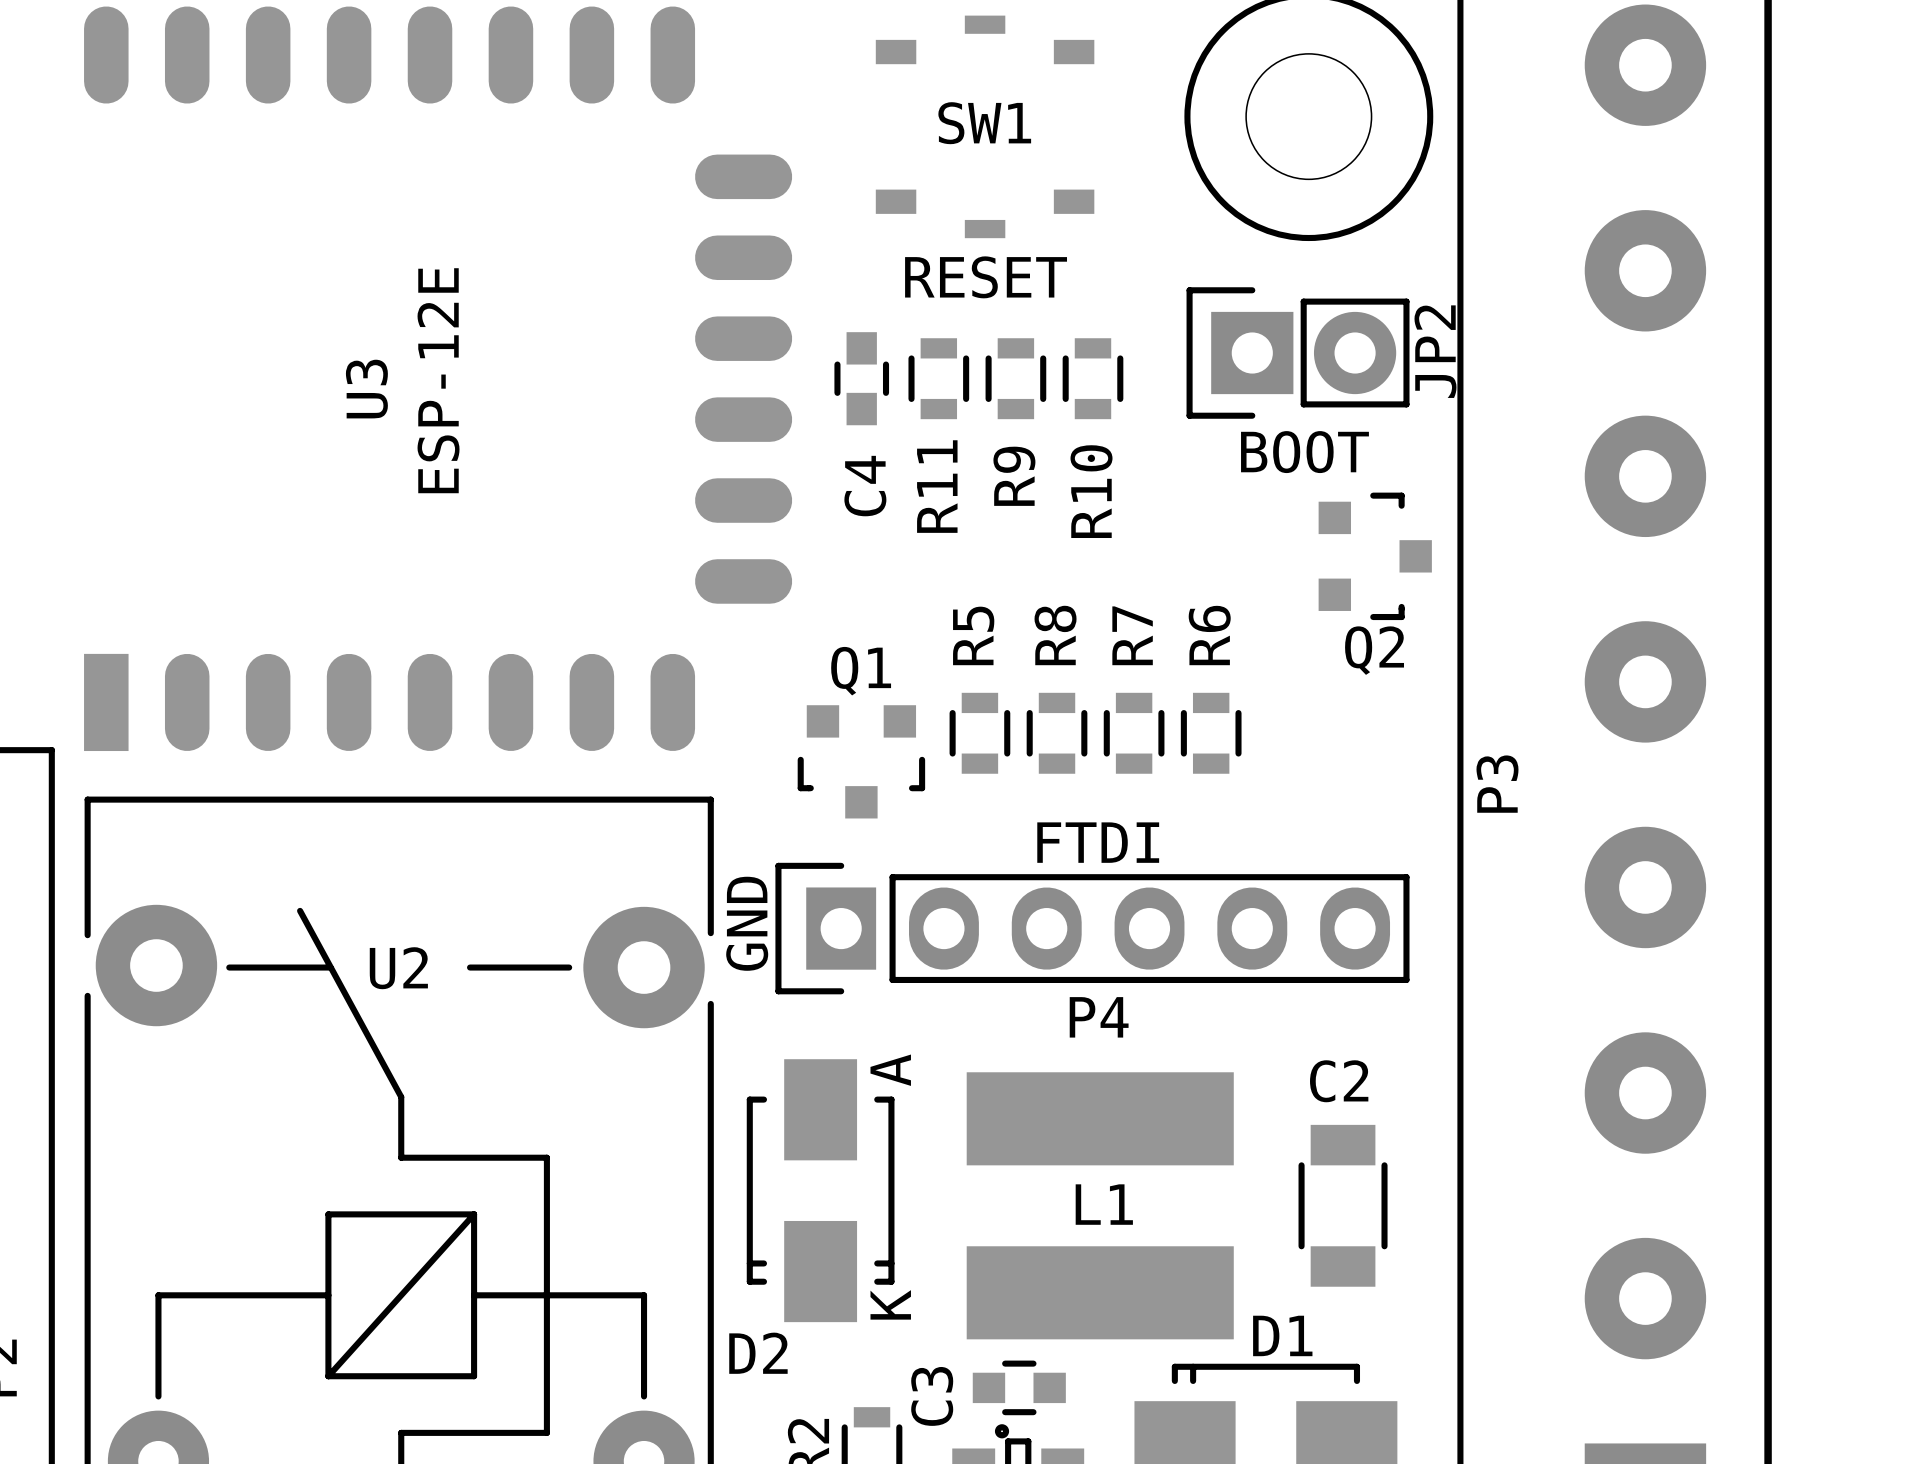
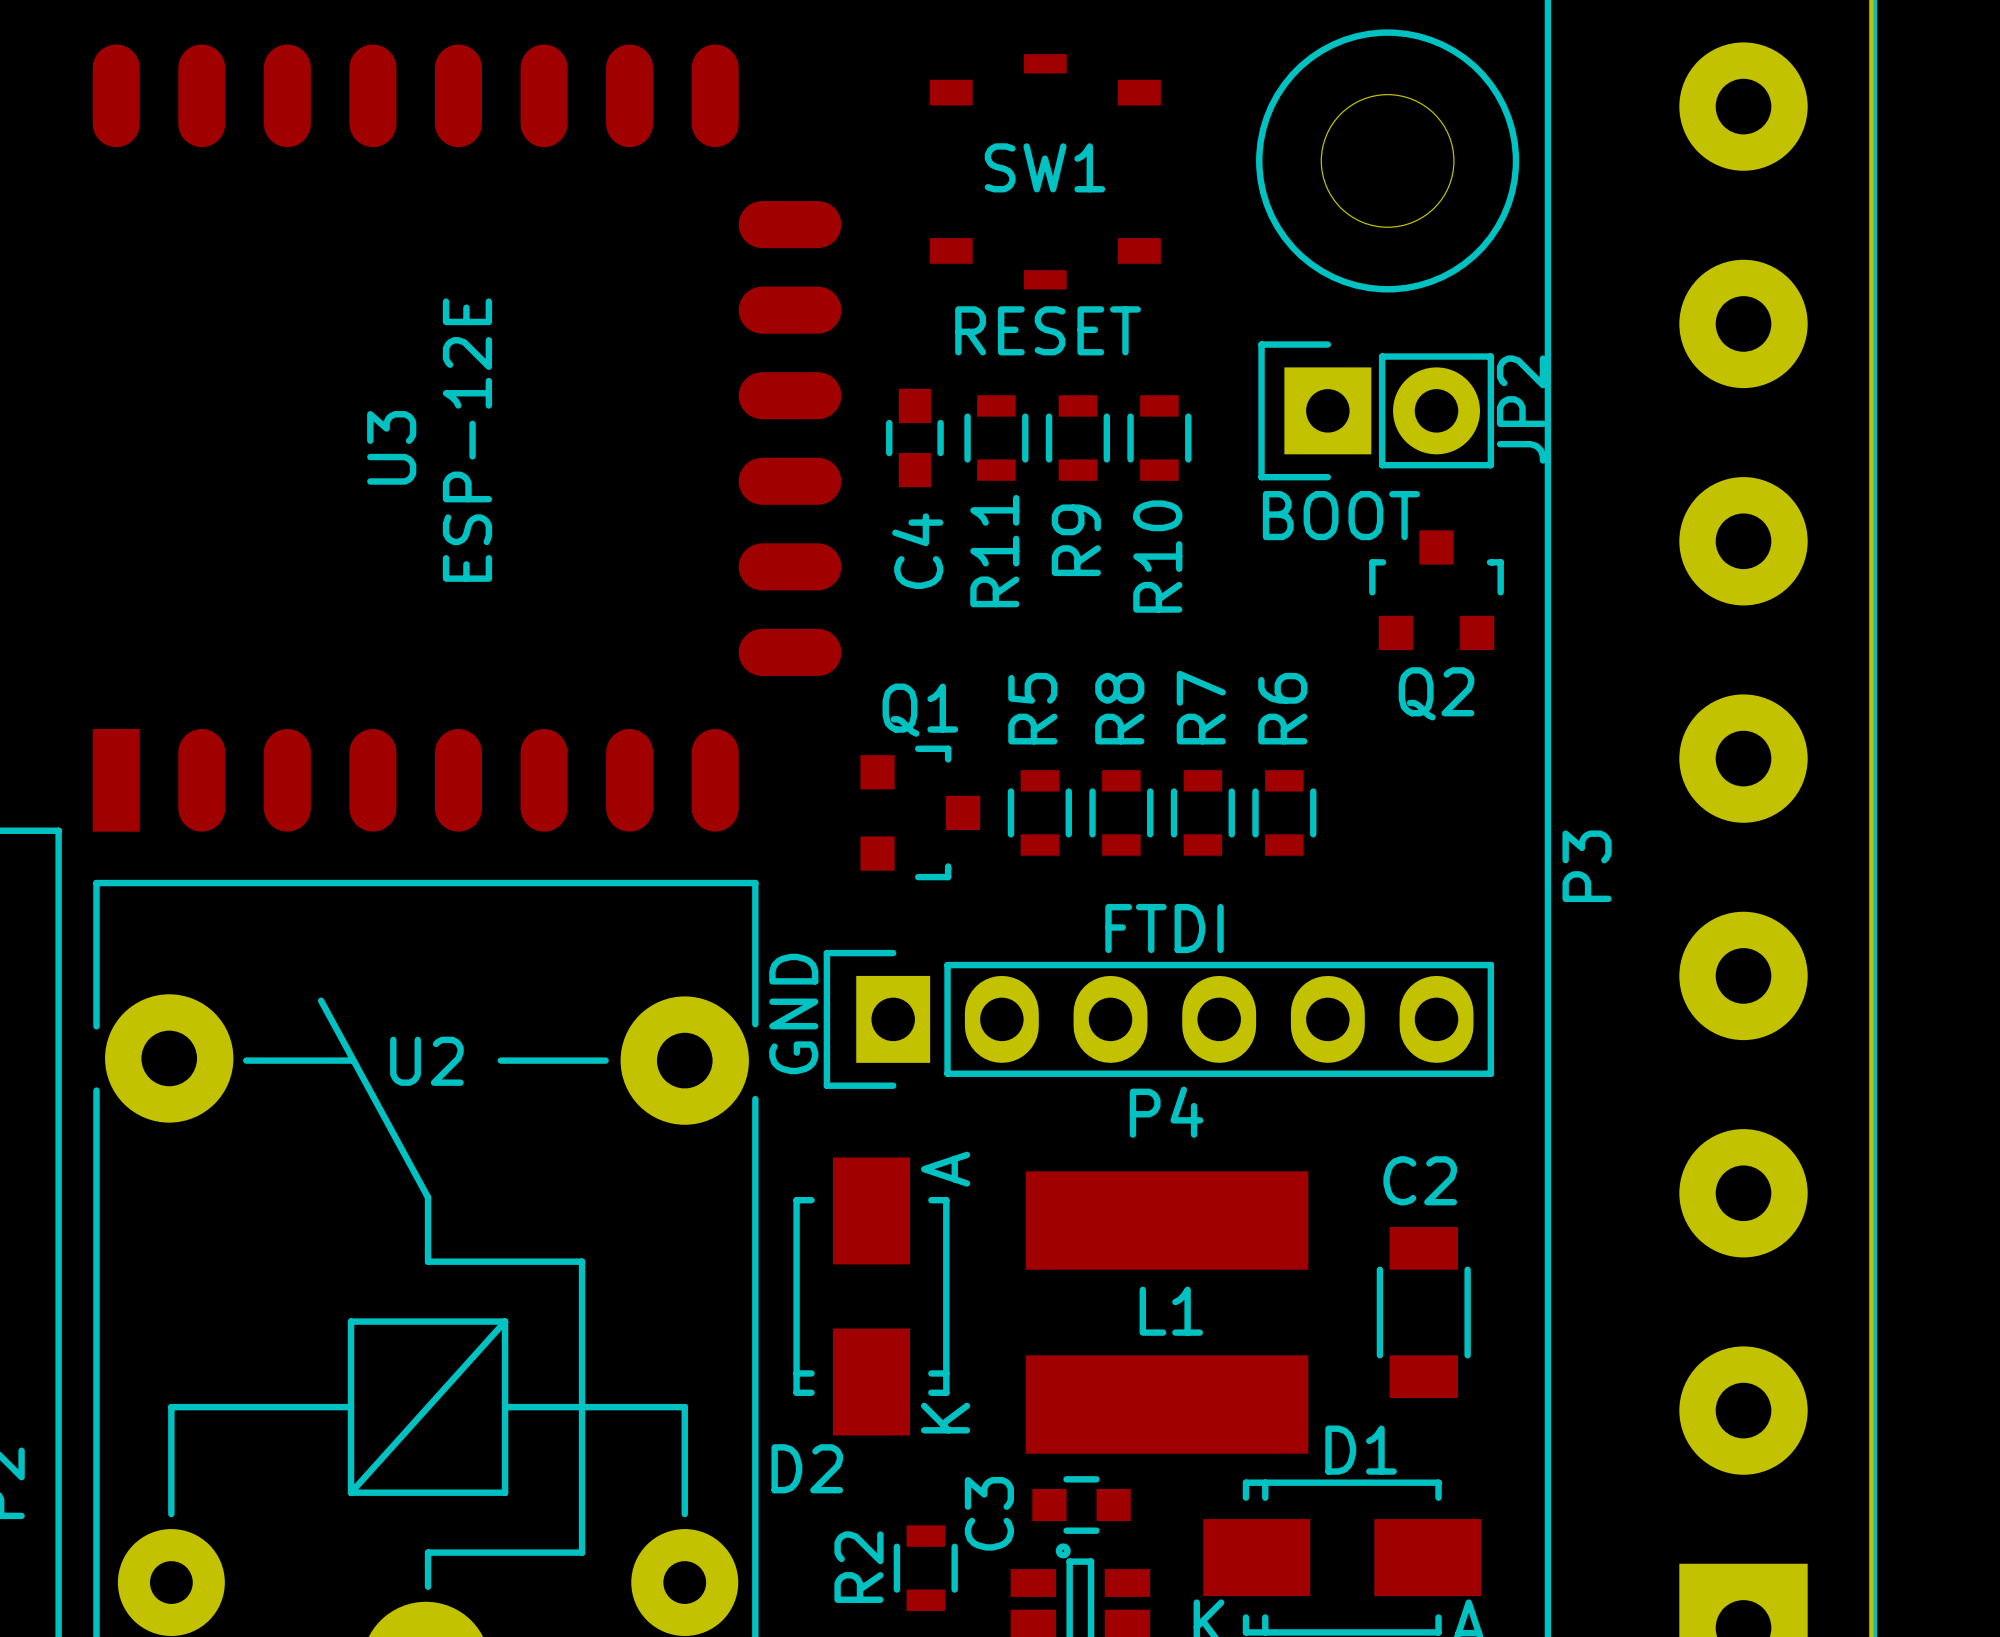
JP2 value position: BOOT (1304, 452) -> BOOT (1341, 515)
Q2 rotation: 0° (1375, 556) -> 90° counterclockwise (1436, 590)
Q1 rotation: 0° (861, 761) -> 90° counterclockwise (920, 812)

